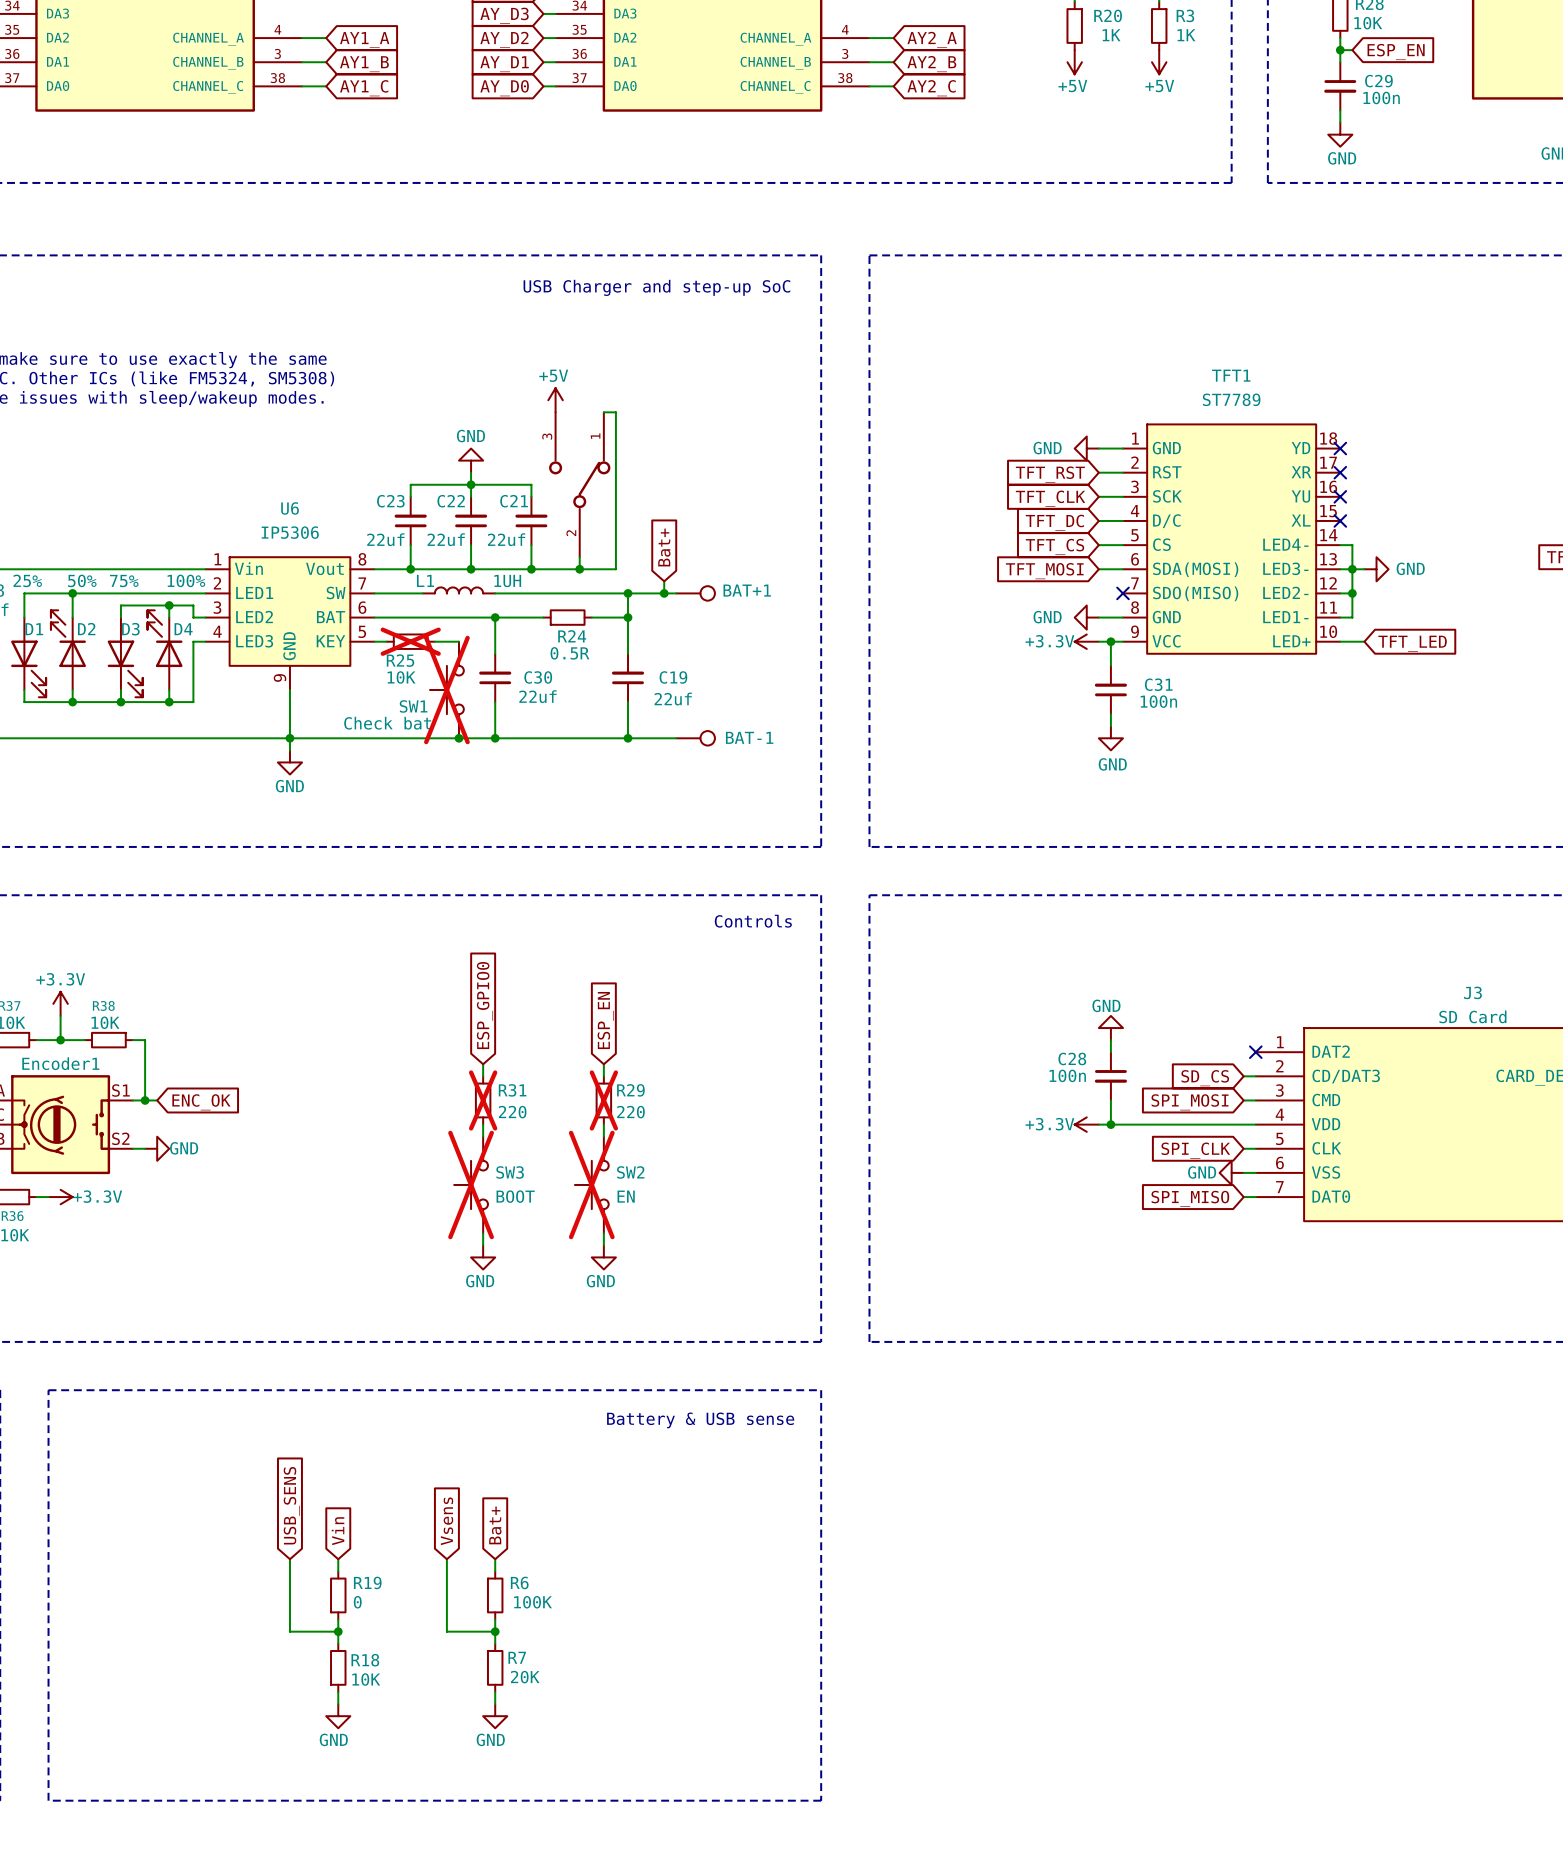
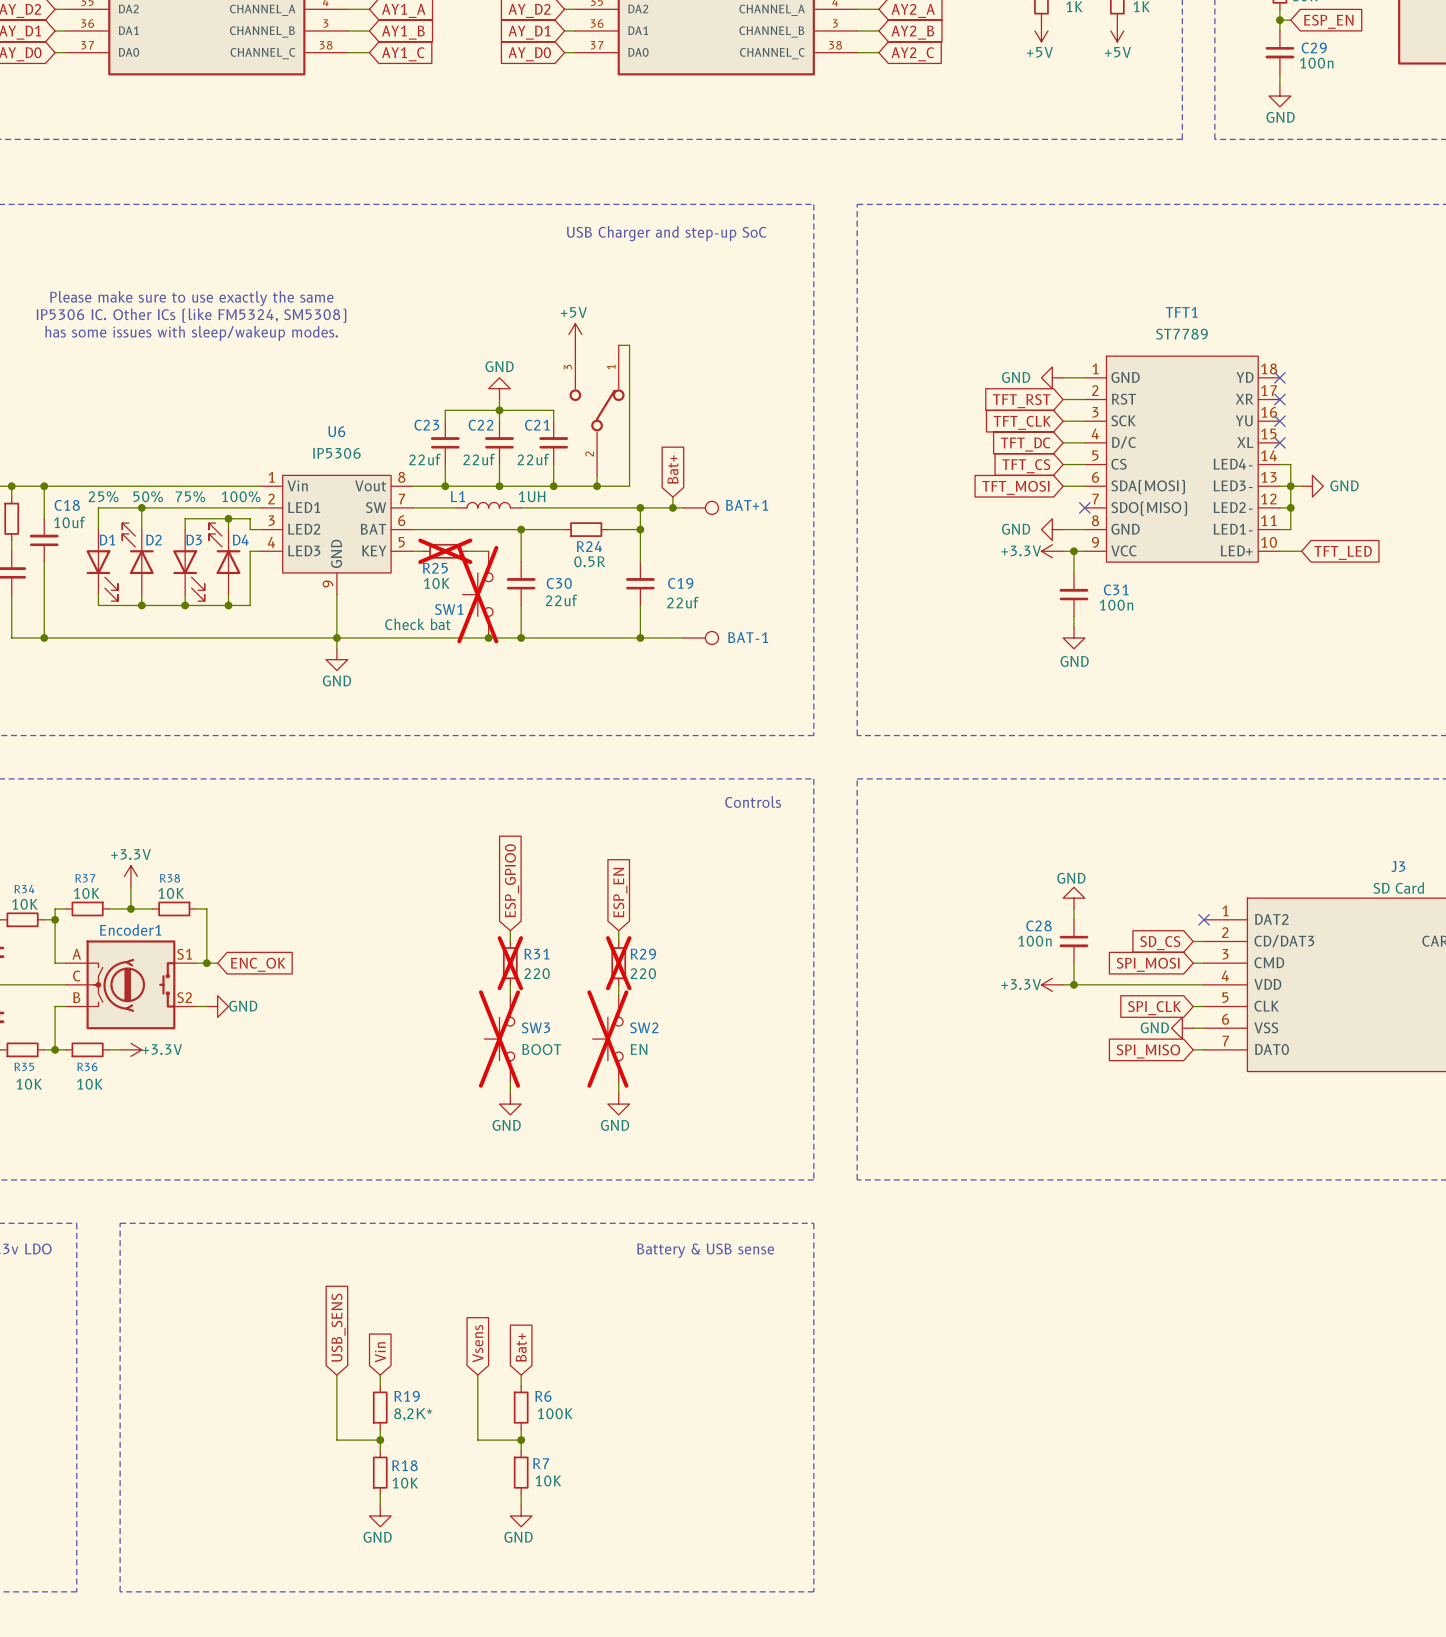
R19 value: 0 (357, 1602) -> 8,2К* (413, 1414)
R7 value: 20K (525, 1677) -> 10K (548, 1480)

